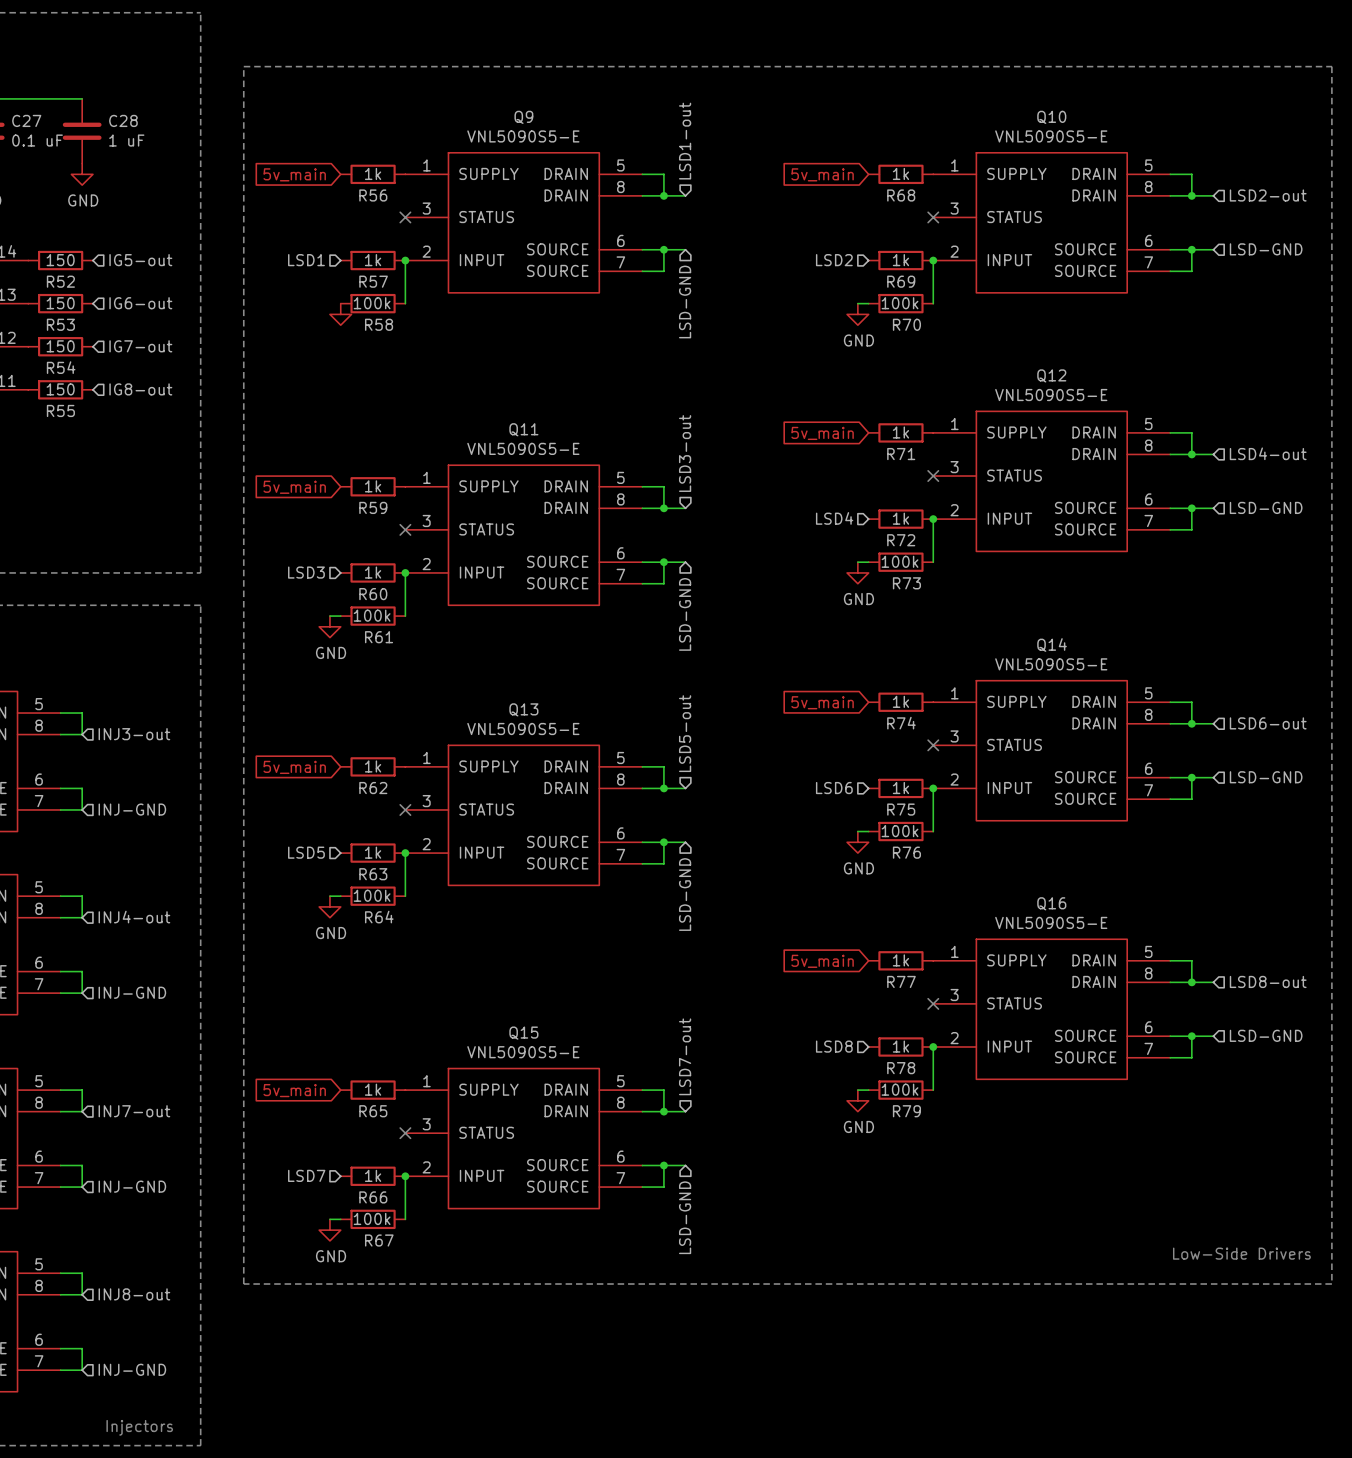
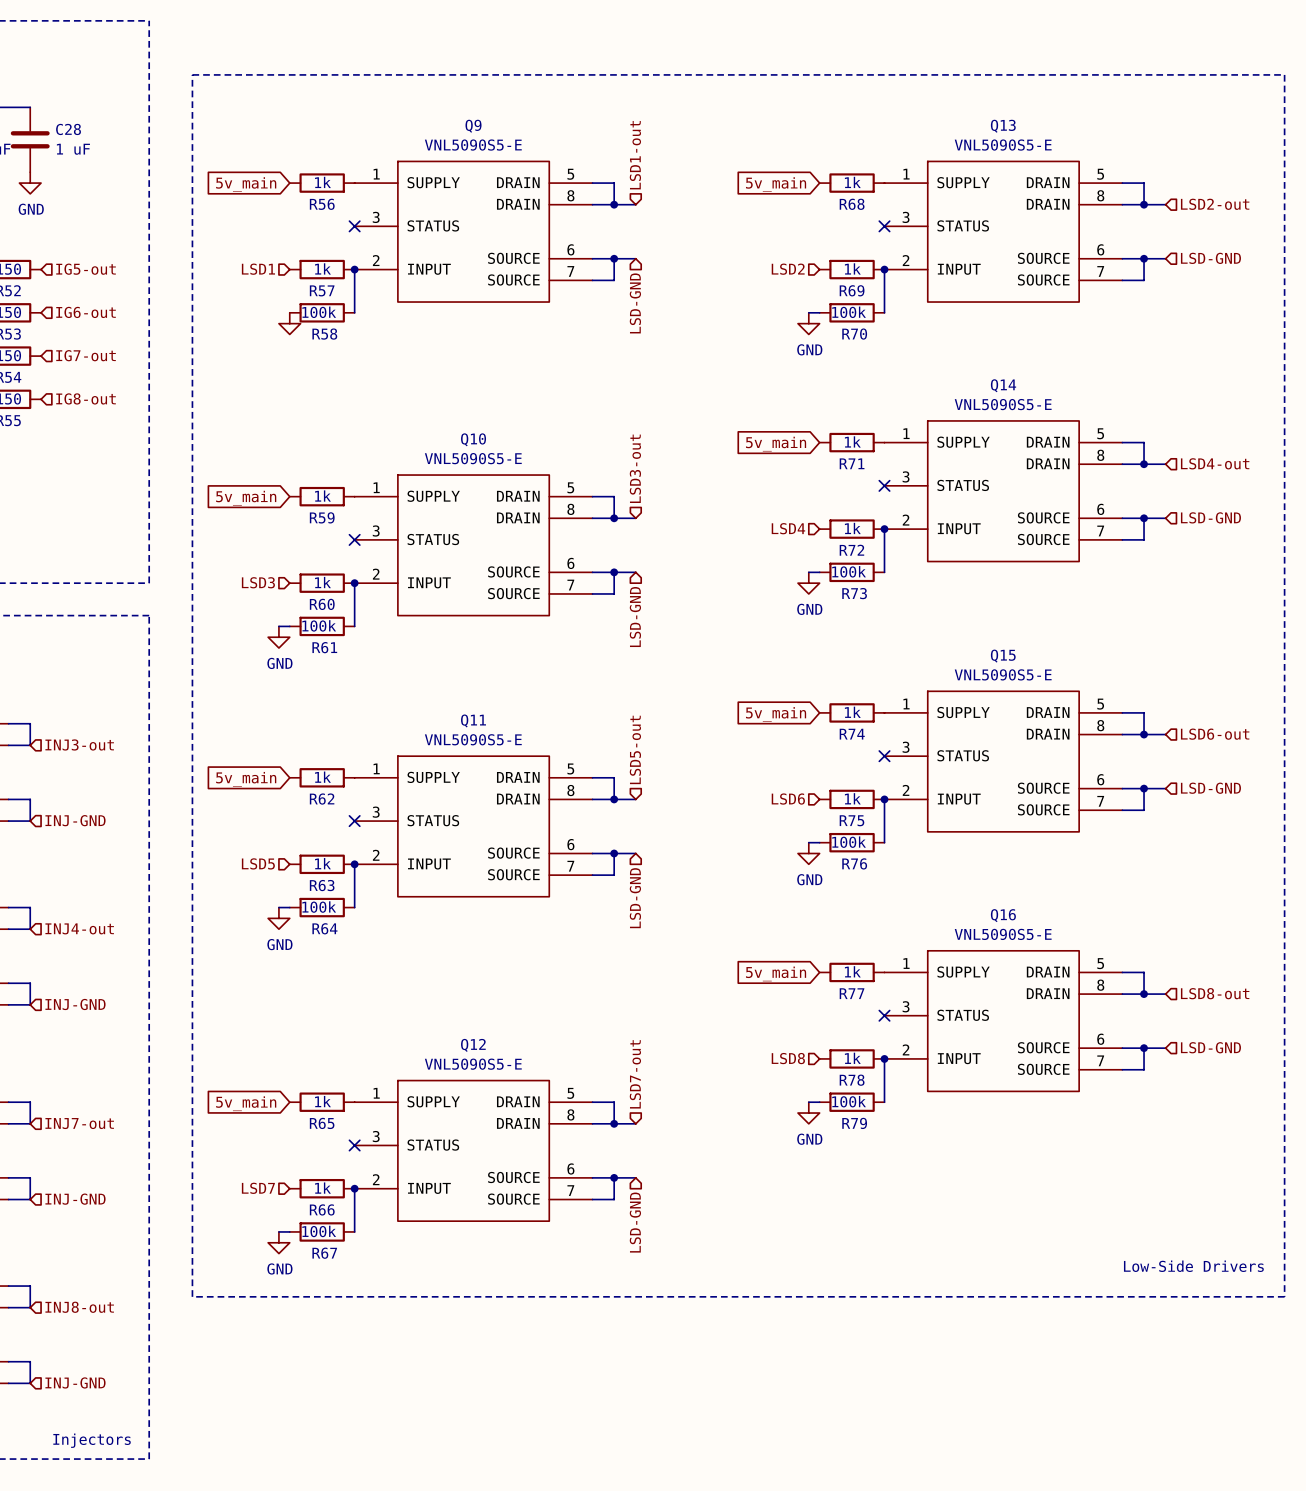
Q10 name: Q10 (1051, 117) -> Q13 (1003, 126)
Q12 name: Q12 (1051, 375) -> Q14 (1003, 385)
Q11 name: Q11 (523, 429) -> Q10 (473, 439)
Q14 name: Q14 (1052, 645) -> Q15 (1003, 656)
Q13 name: Q13 (523, 709) -> Q11 (473, 720)
Q15 name: Q15 (523, 1033) -> Q12 (473, 1045)

